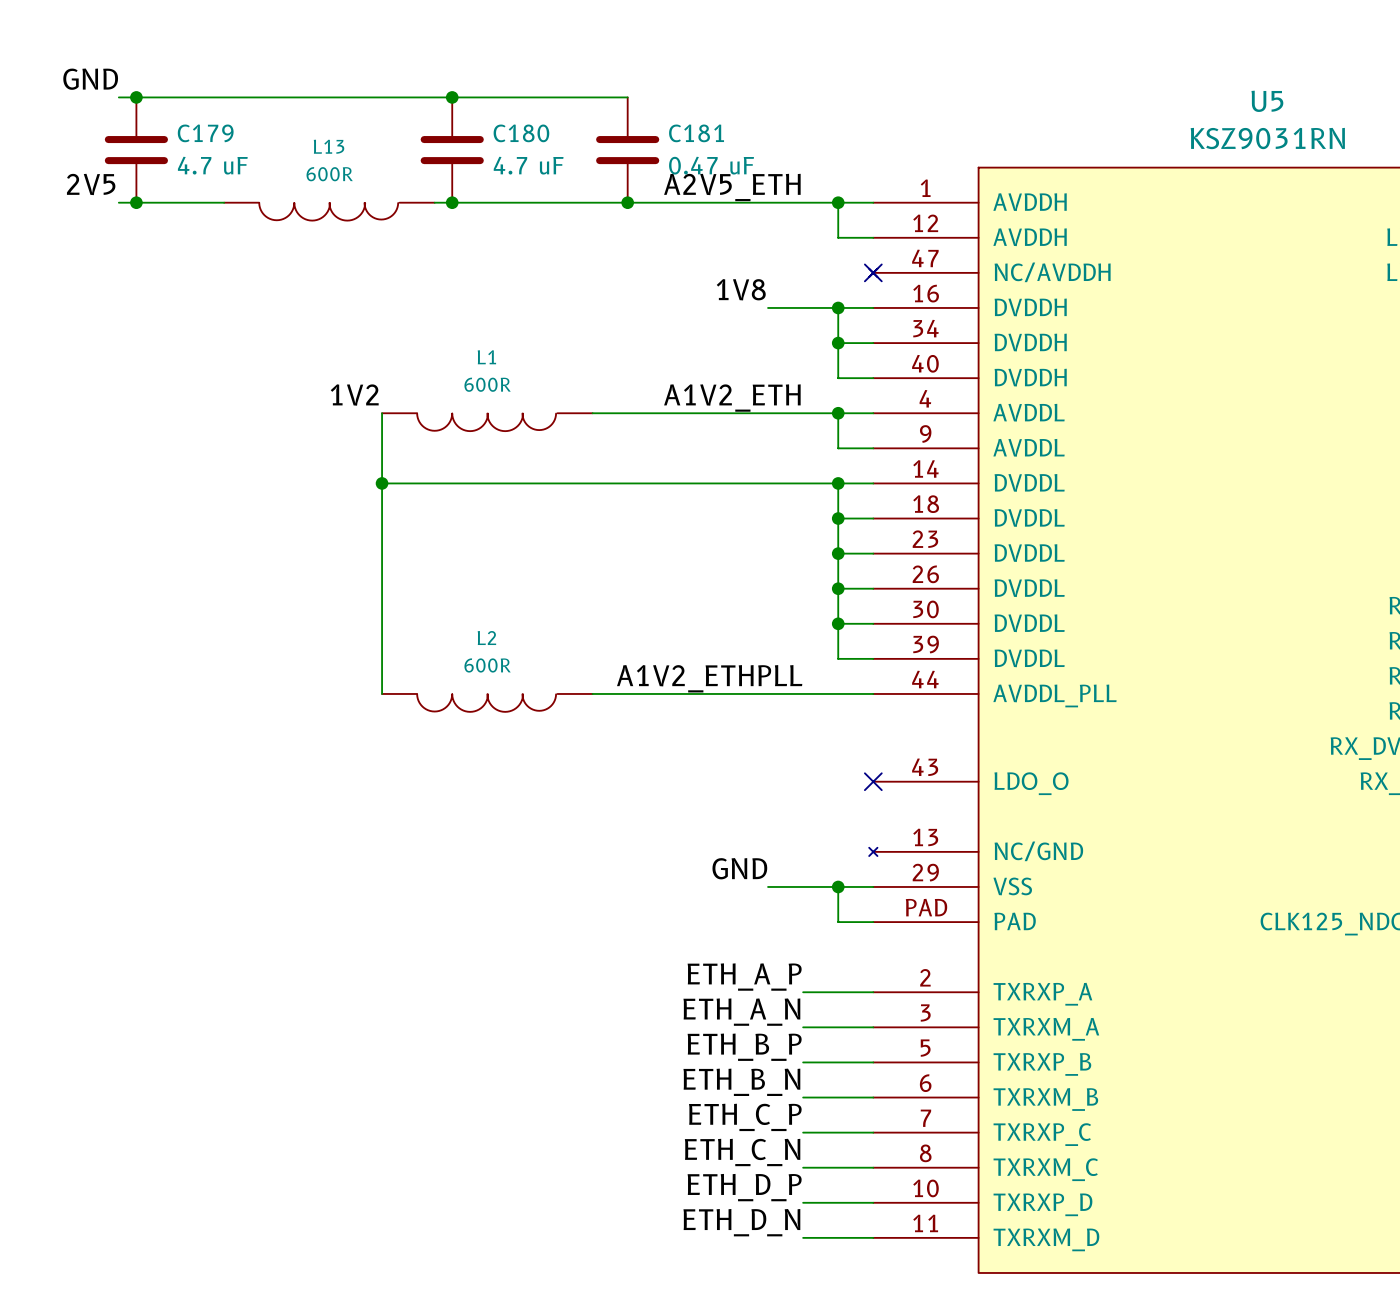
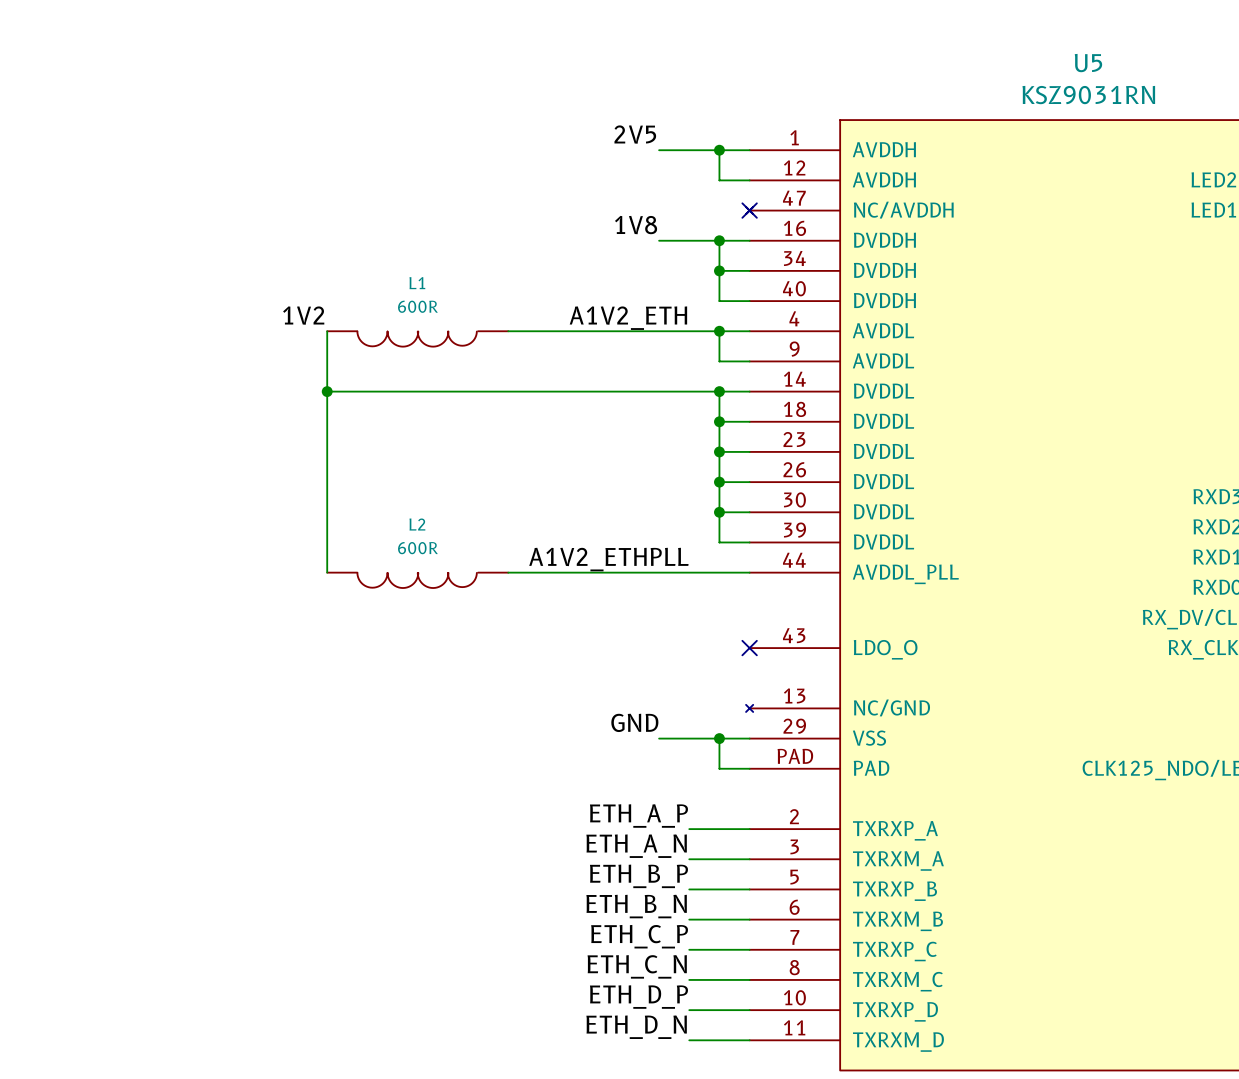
label: GND (90, 79) -> none
wire: (118, 97) (627, 97) -> none
junction: (136, 97) -> none
junction: (452, 97) -> none
C179: 4.7 uF (136, 150) -> none
C180: 4.7 uF (452, 150) -> none
C181: 0.47 uF (627, 150) -> none
label: 2V5 (91, 184) -> none
label: none -> 2V5 (635, 134)
label: A2V5_ETH (732, 187) -> none
wire: (118, 202) (224, 202) -> none
junction: (136, 202) -> none
wire: (434, 202) (768, 202) -> none
junction: (452, 202) -> none
junction: (627, 202) -> none
L13: 600R (329, 211) -> none

